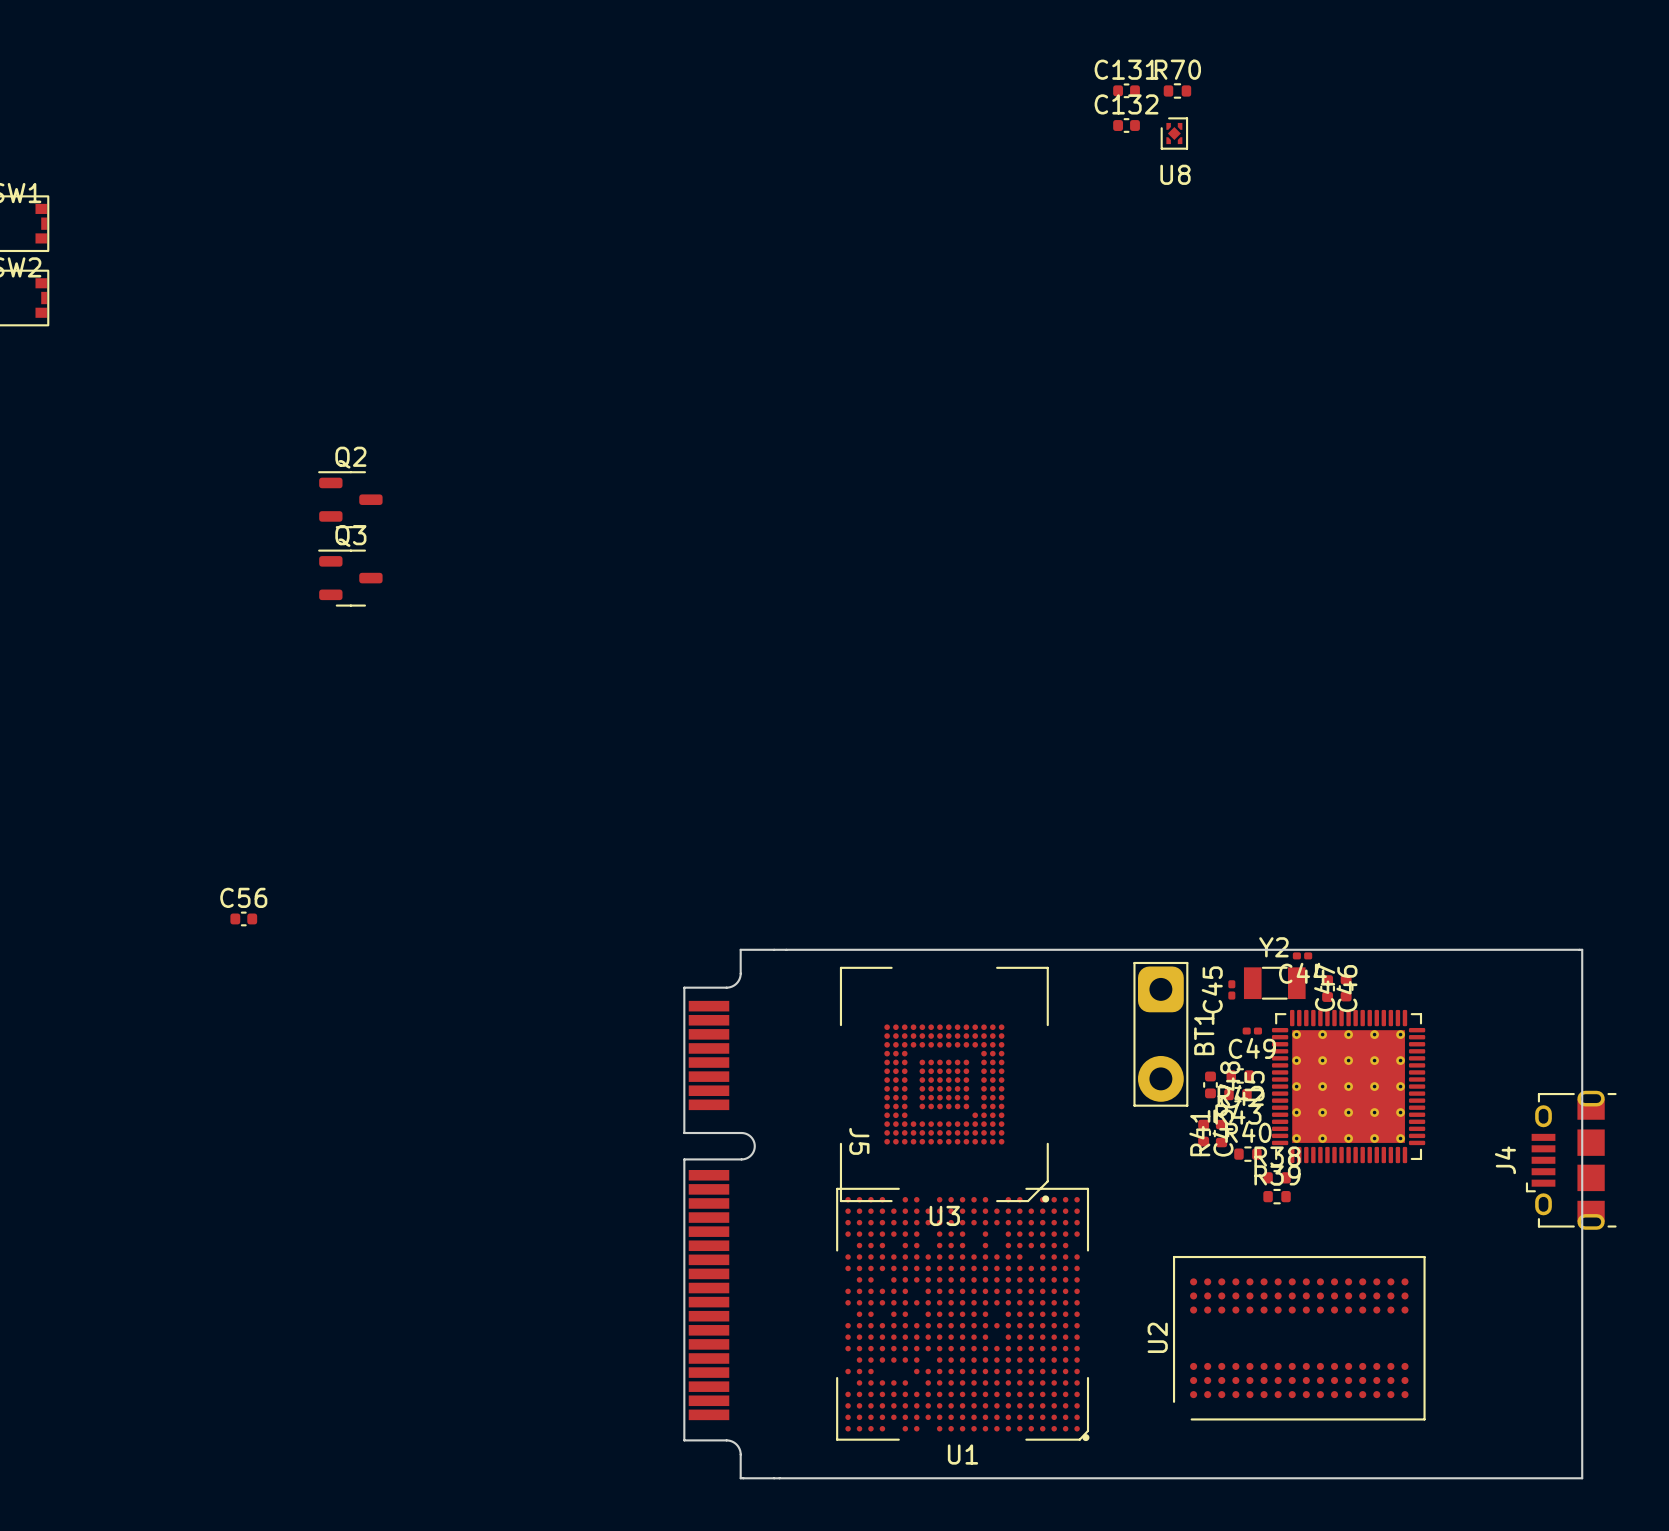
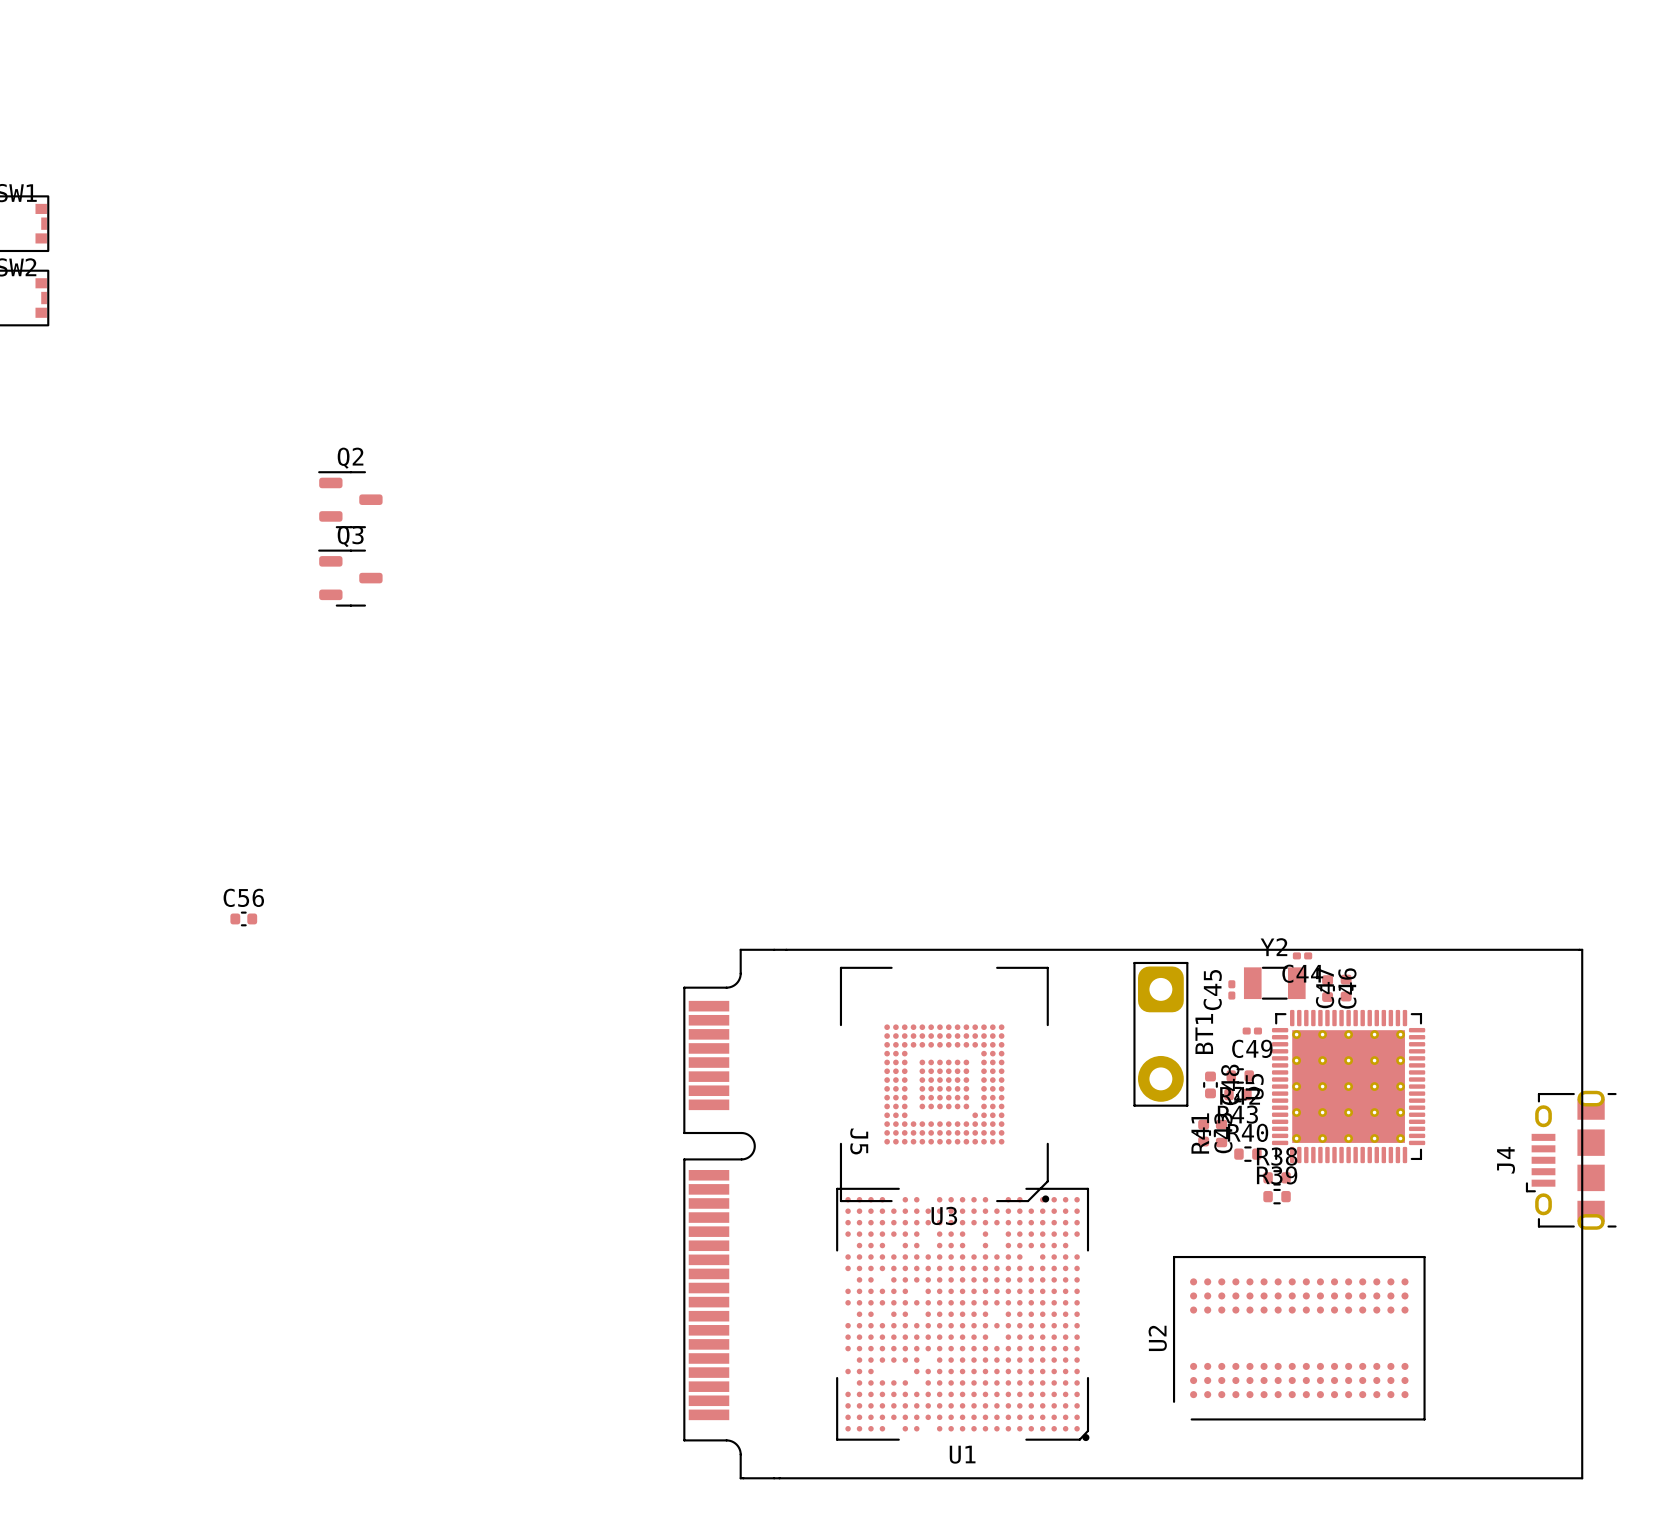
C131: (1126, 90) -> none
R70: (1177, 90) -> none
C132: (1126, 125) -> none
U8: (1174, 133) -> none

